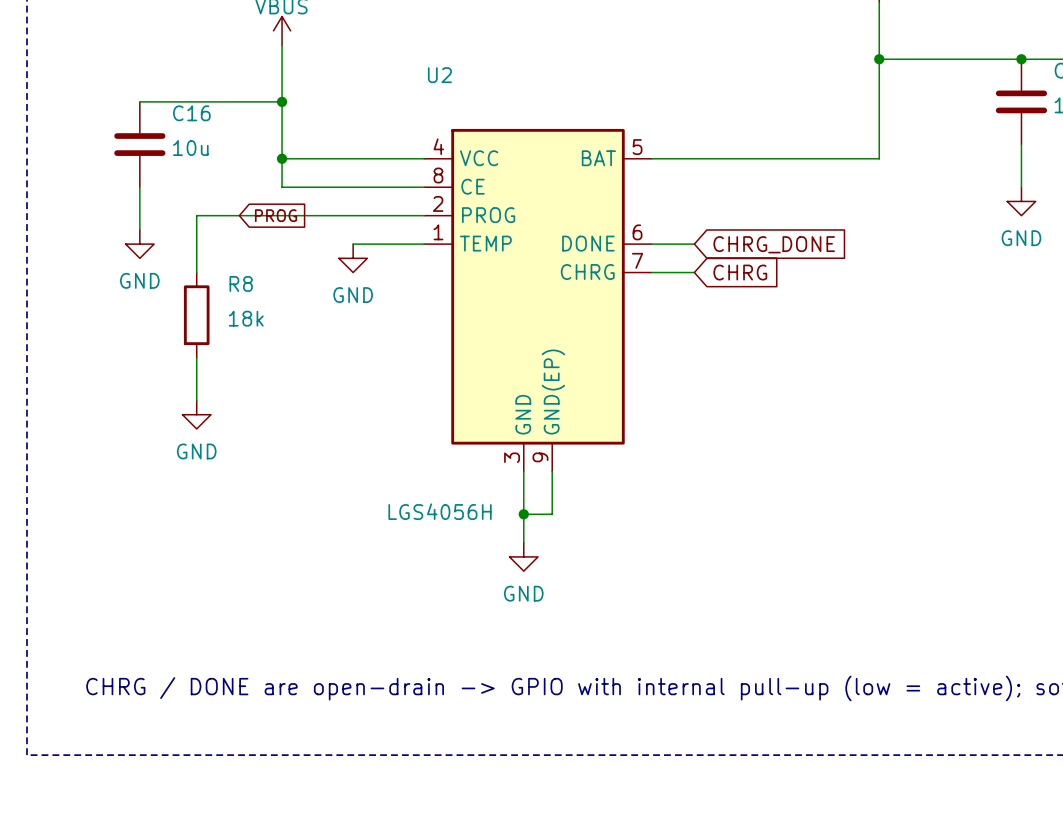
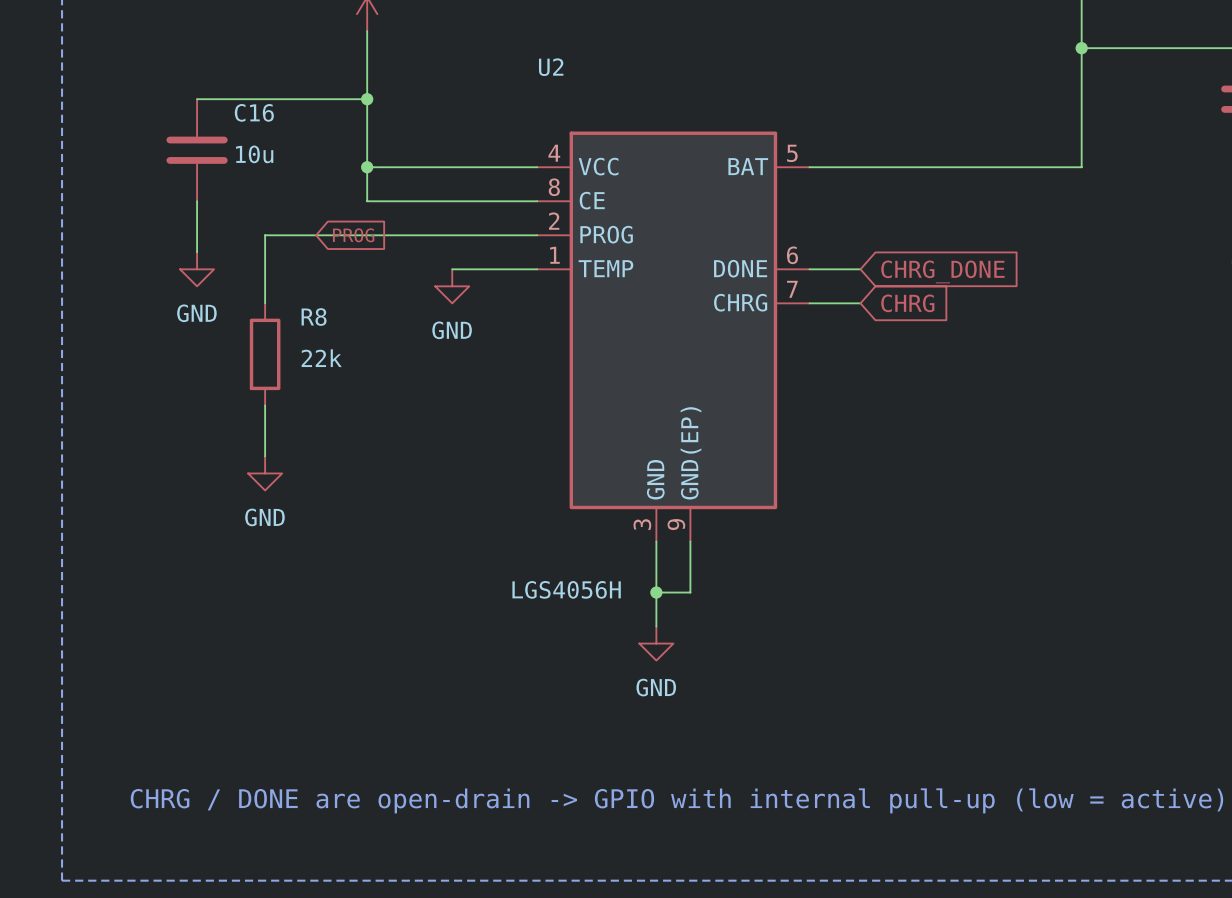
R8 value: 18k (246, 318) -> 22k (321, 358)

